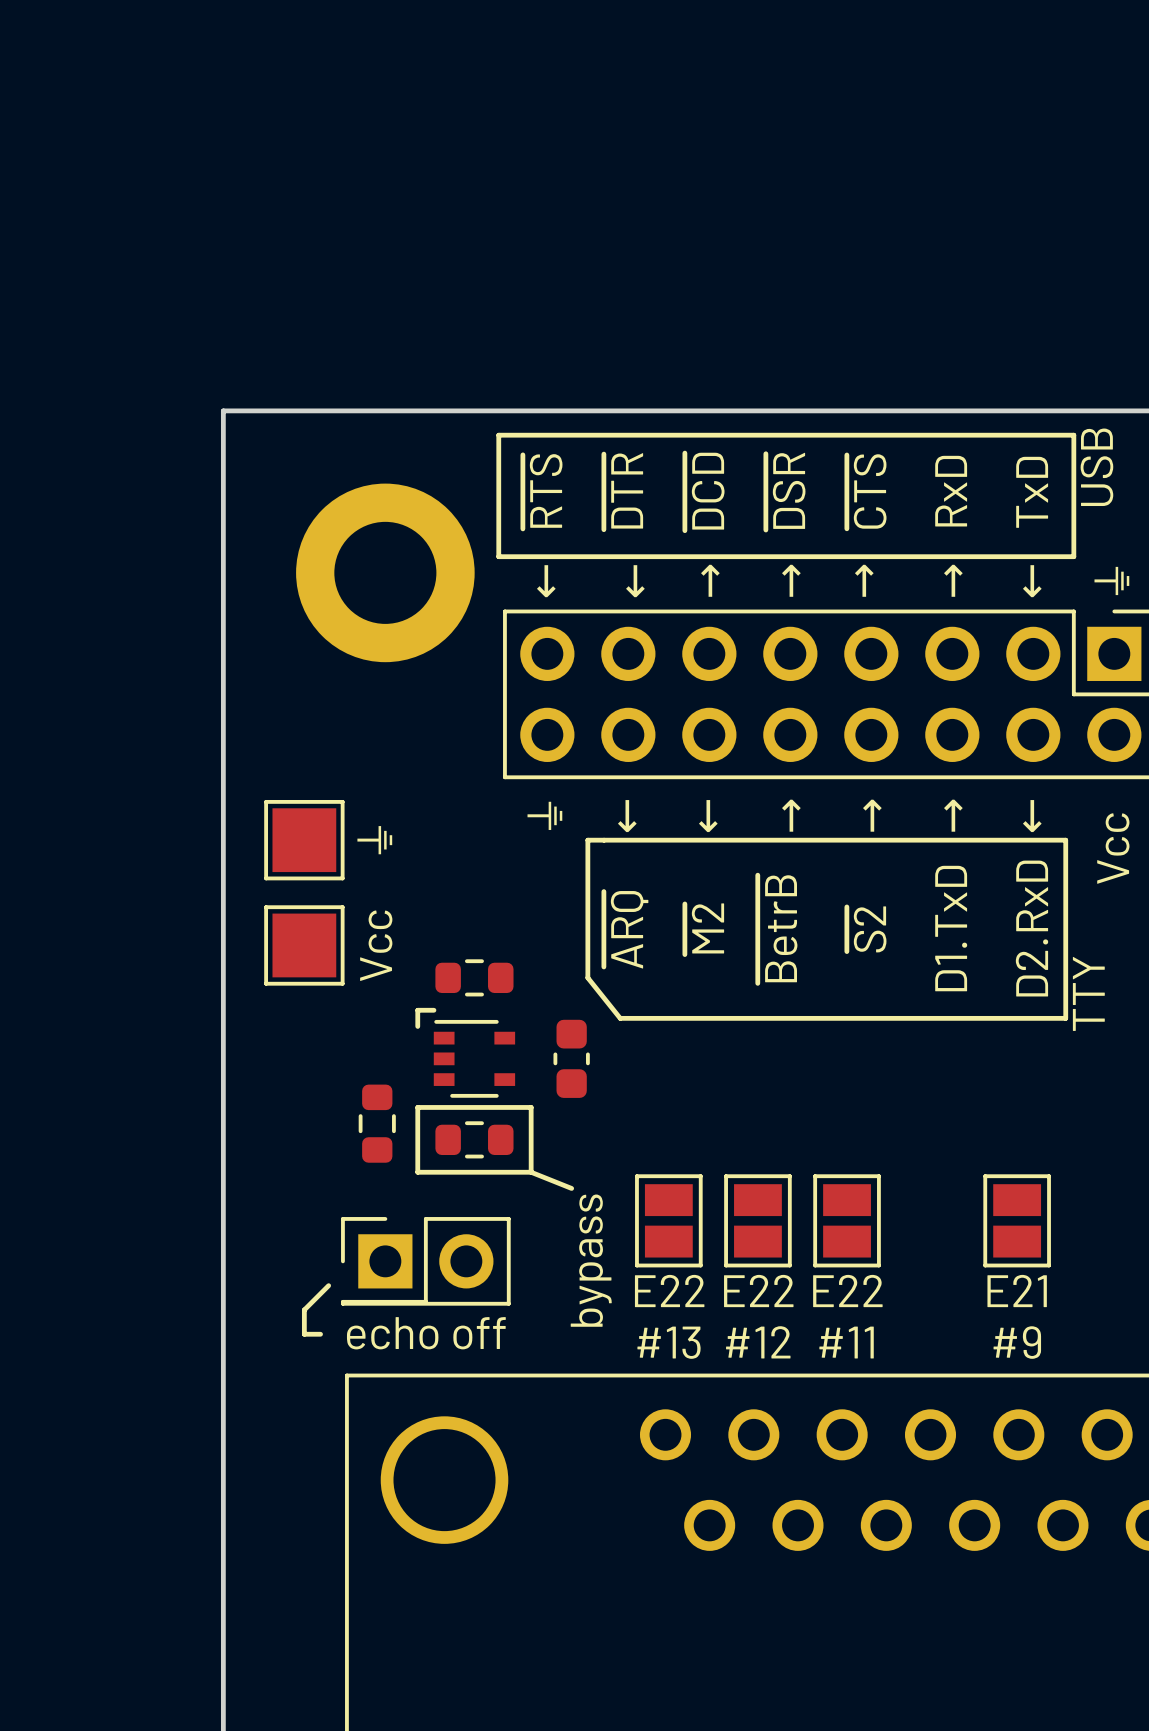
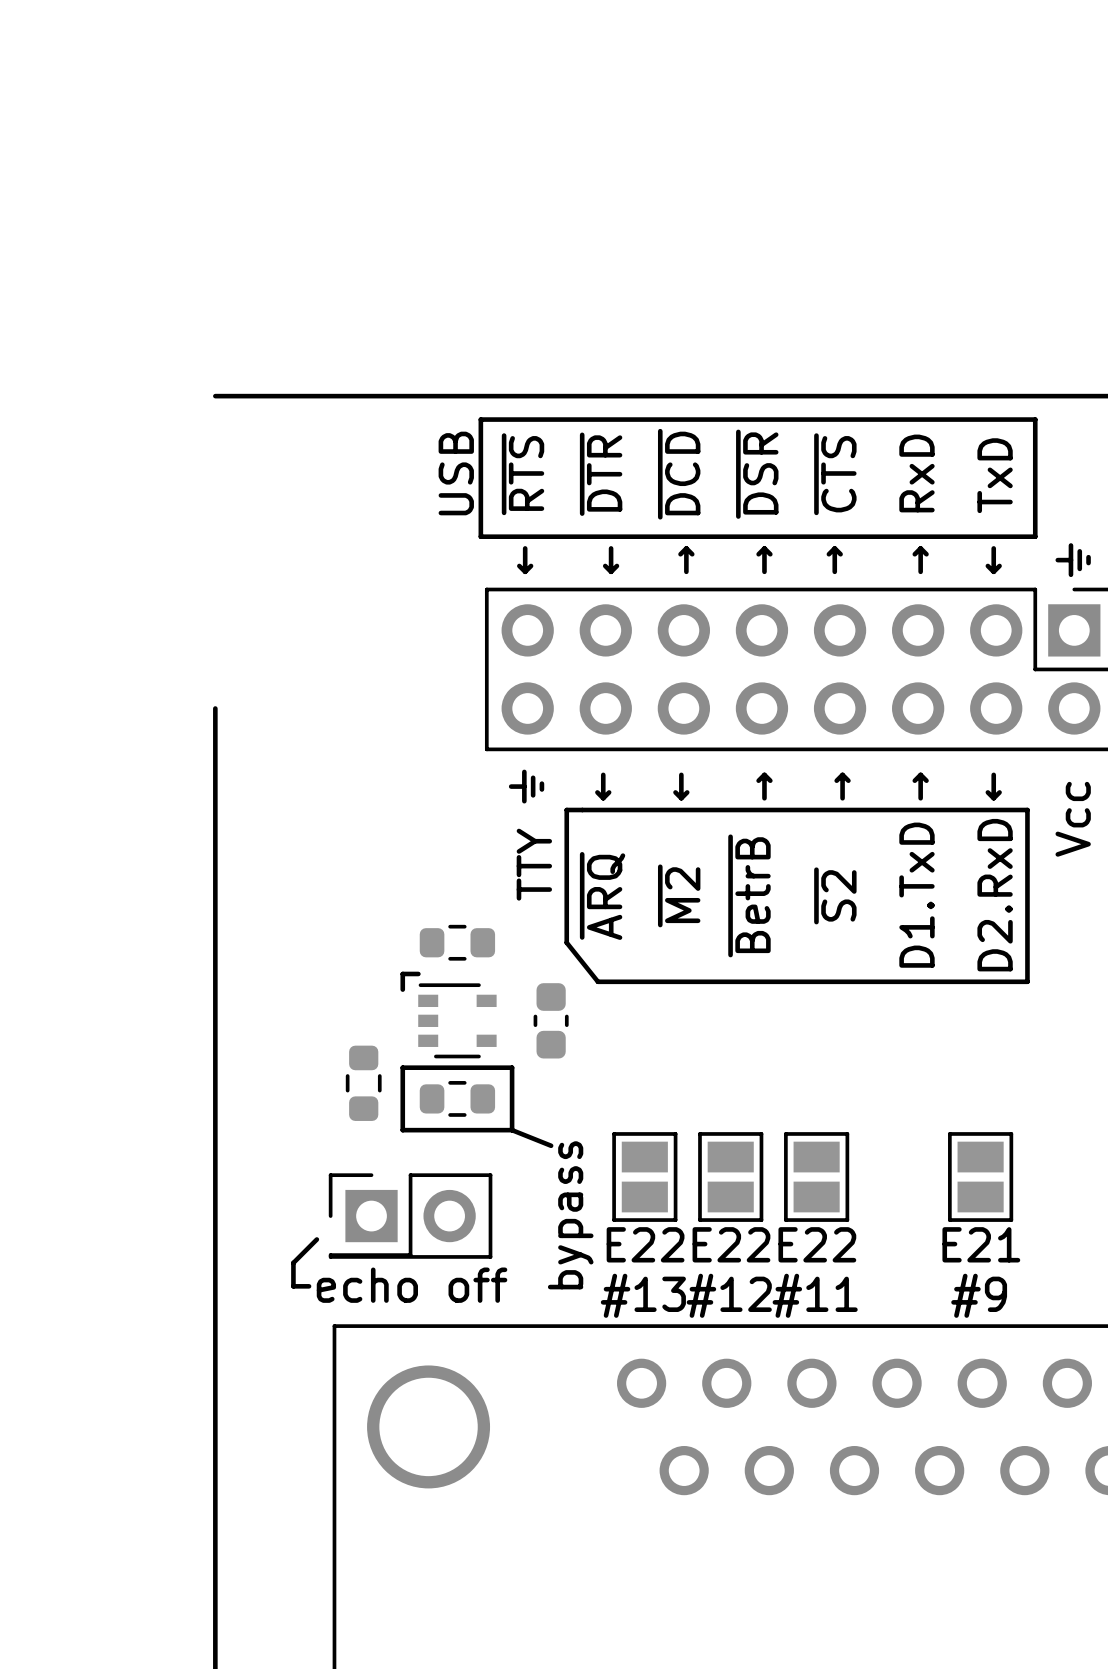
board edge: (223, 410) (223, 734) -> none
text position: USB (1096, 467) -> USB (456, 473)
part: (385, 572) -> none
part: (304, 840) -> none
text: ⏚ (374, 840) -> none
part: (304, 945) -> none
text: Vcc (376, 945) -> none
text position: TTY (1088, 993) -> TTY (534, 864)

